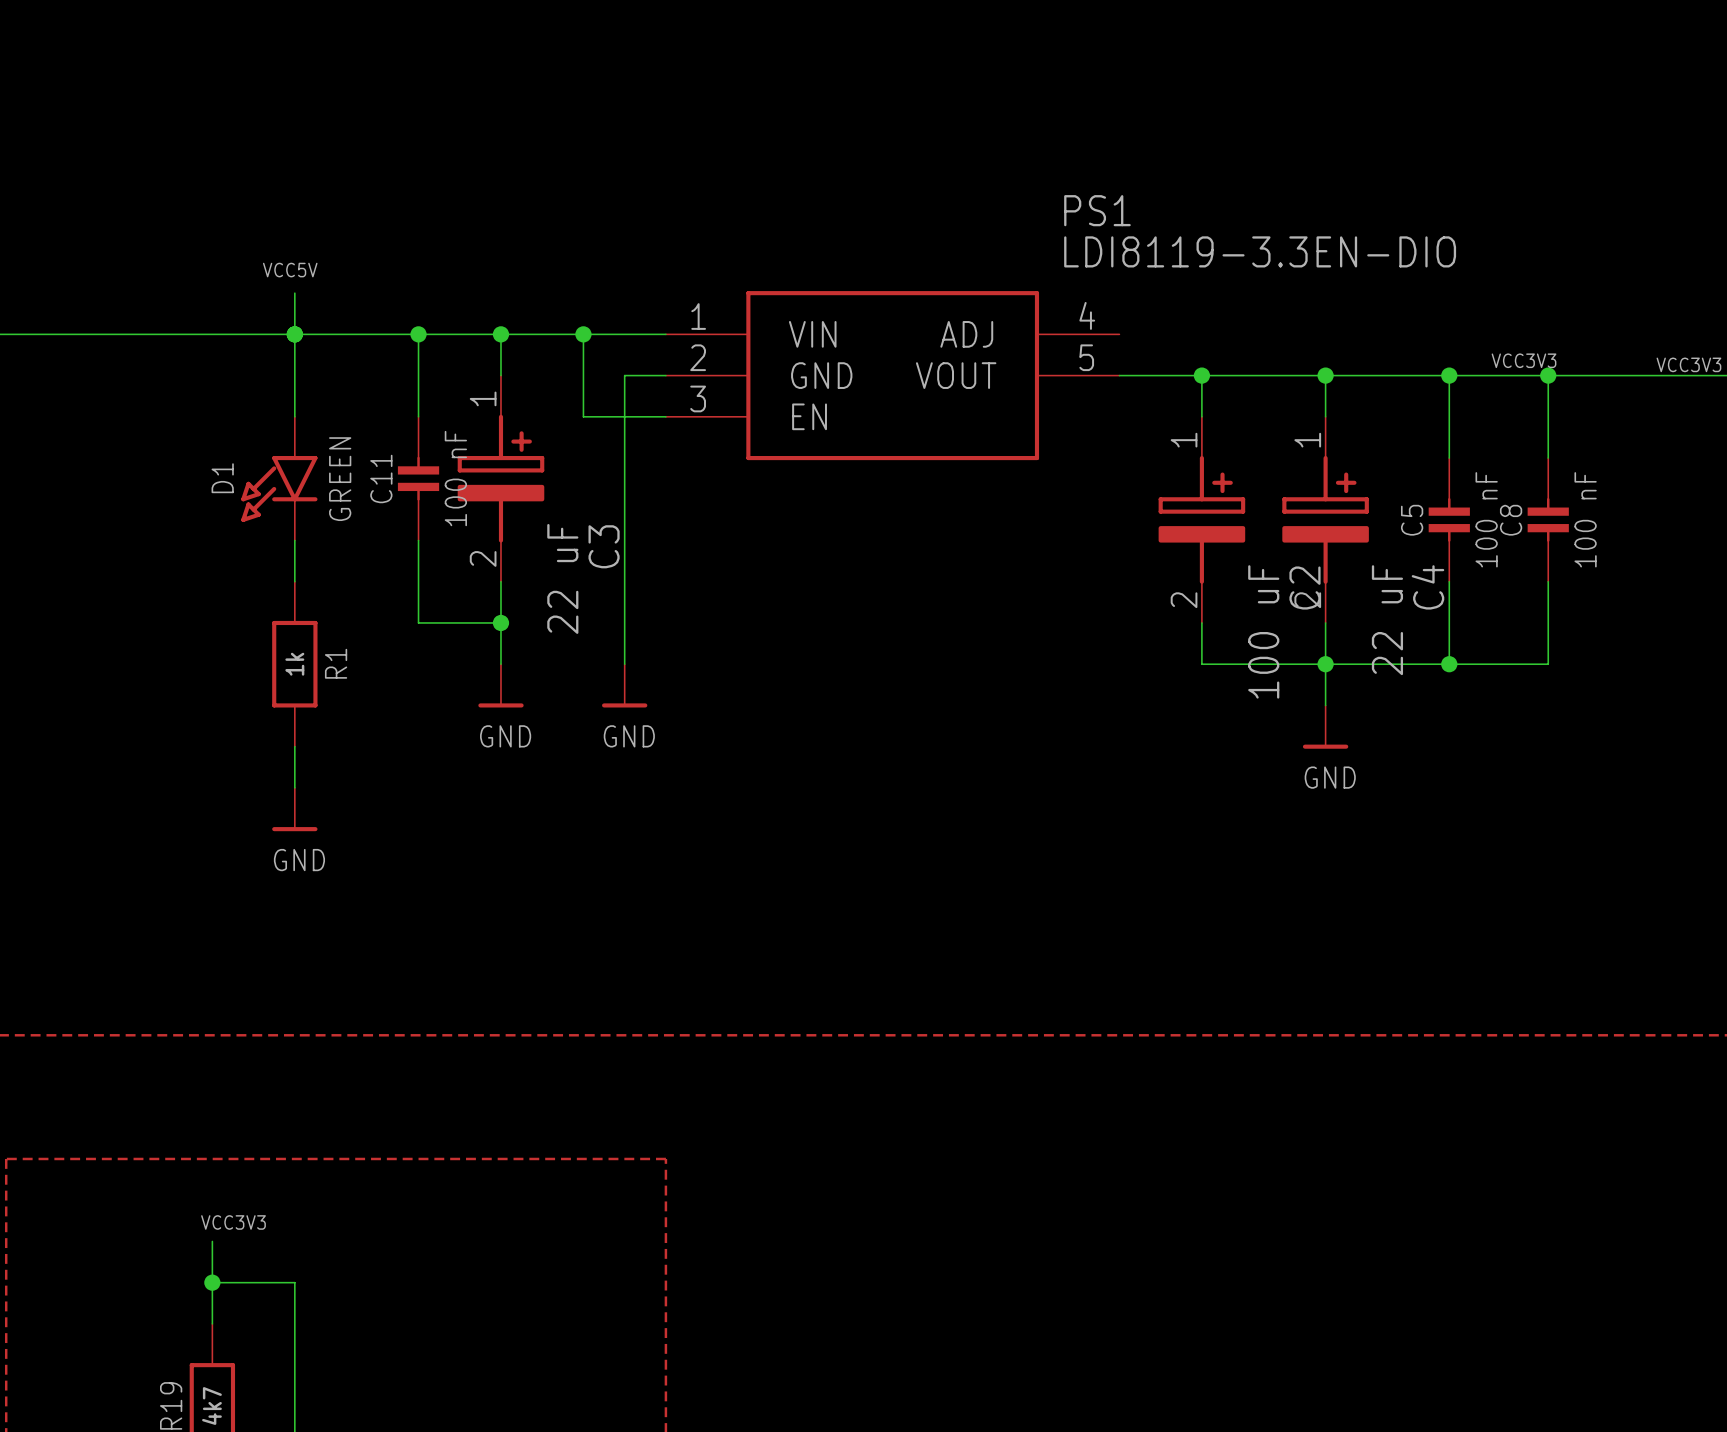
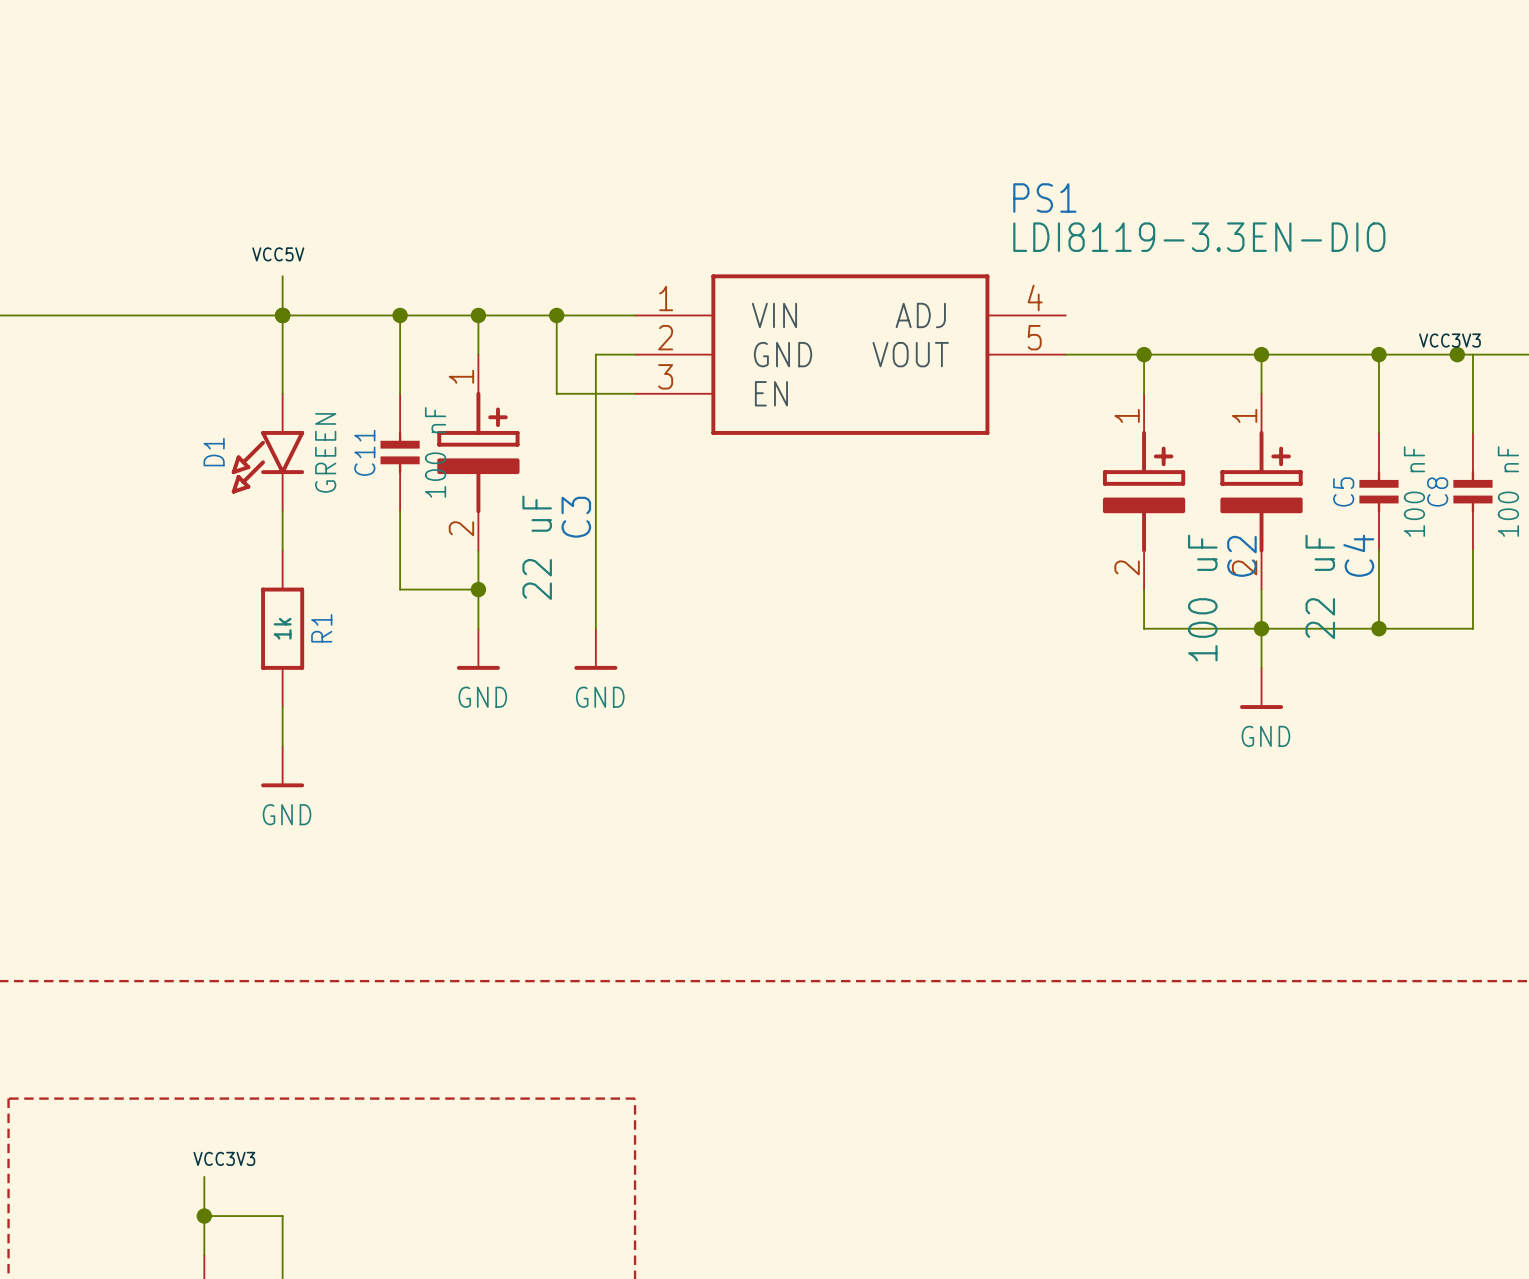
junction position: (1548, 375) -> (1457, 354)

